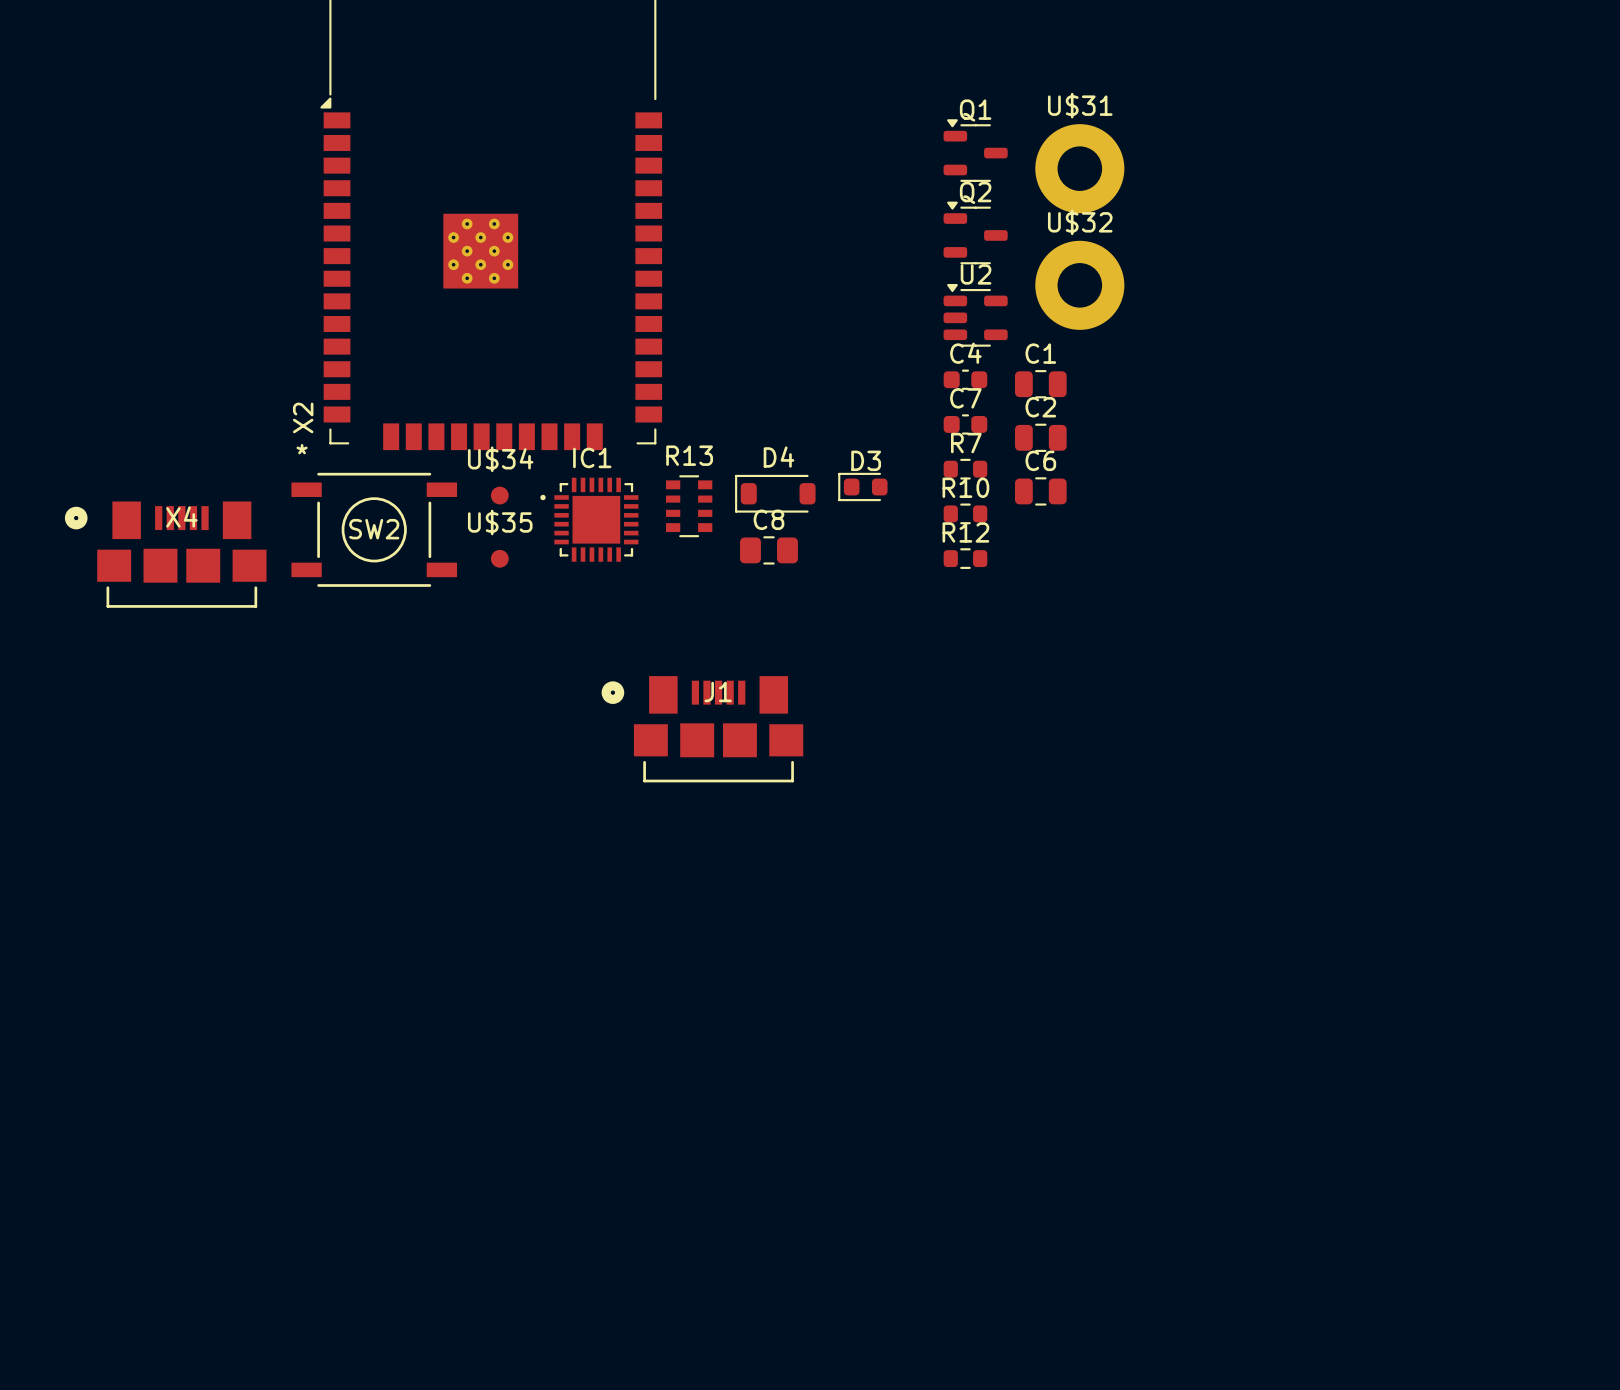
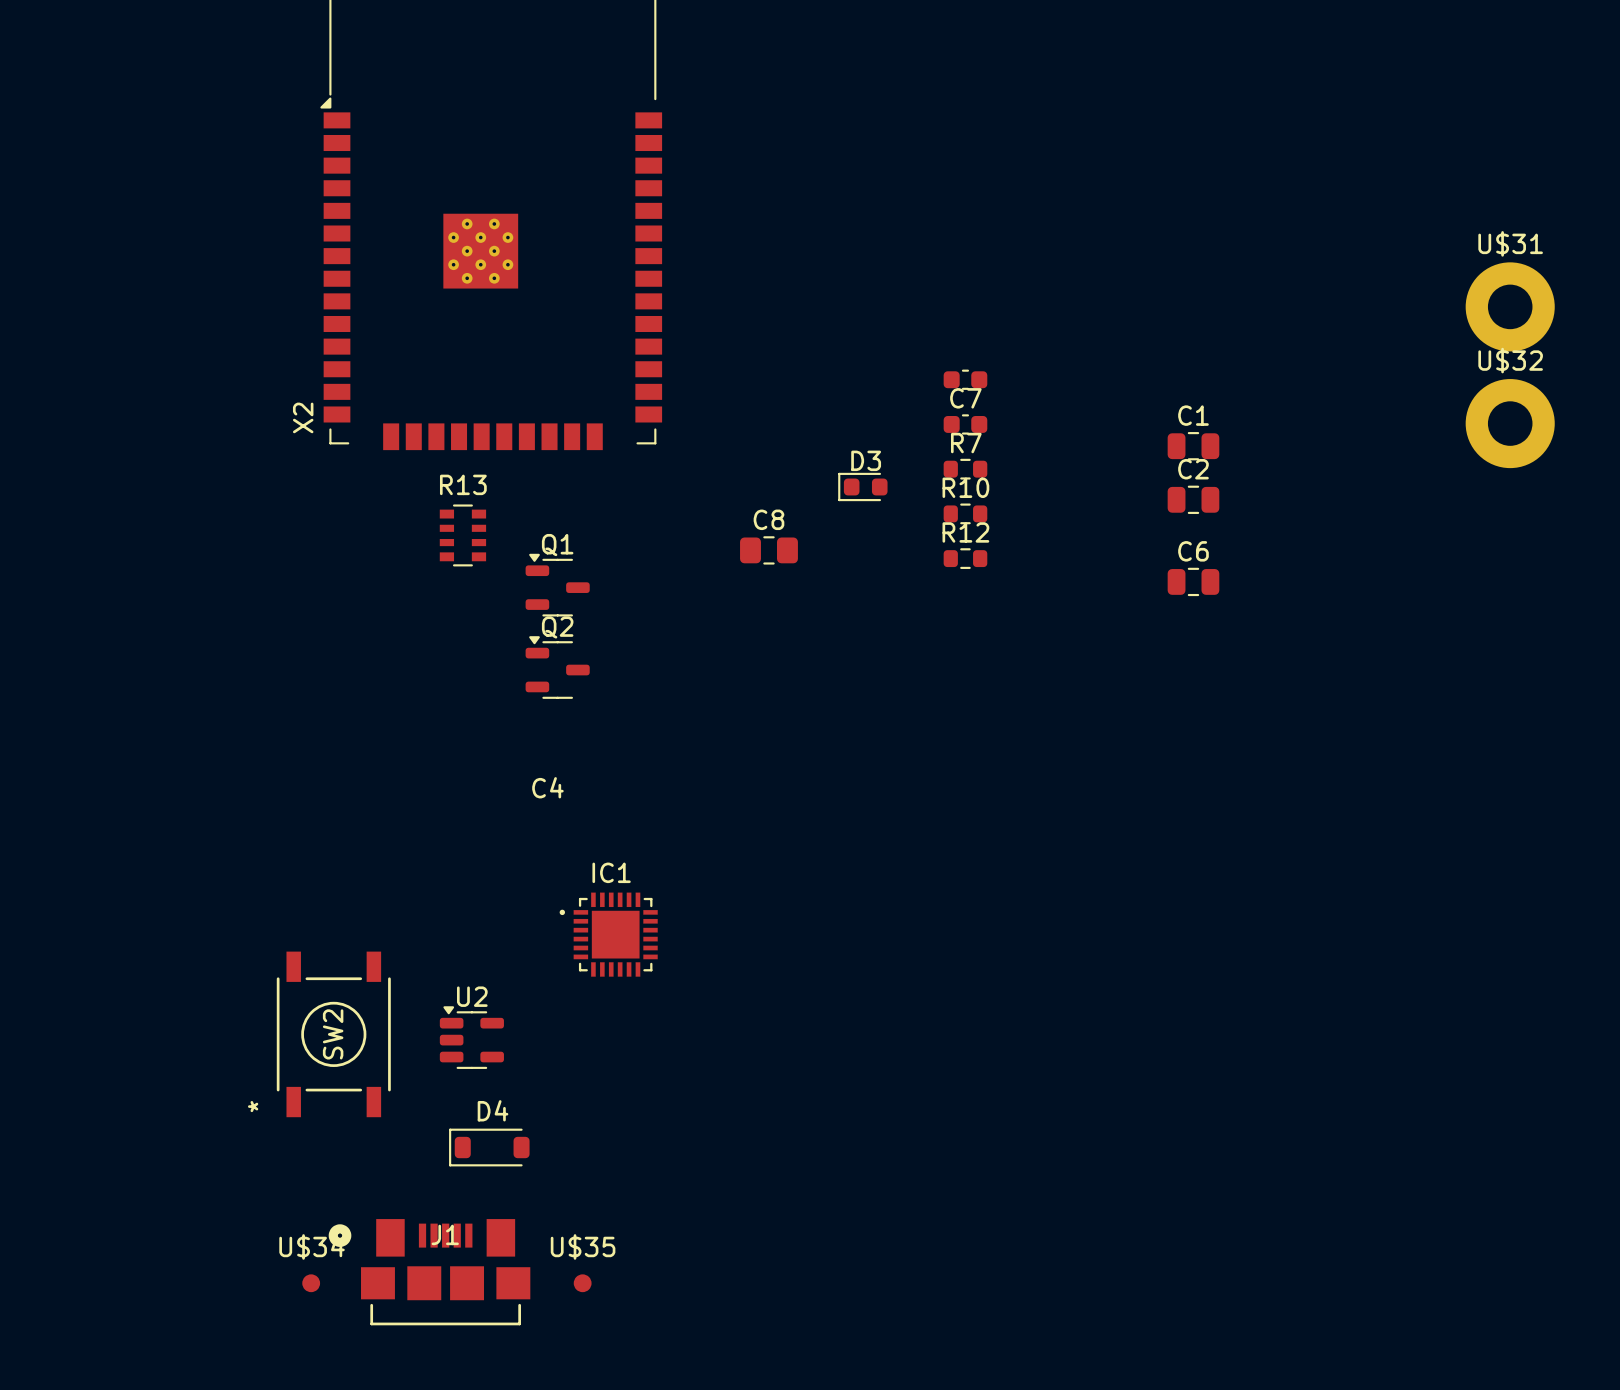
Q1 position: (975, 150) -> (557, 585)
U$31 position: (1079, 168) -> (1510, 306)
Q2 position: (975, 232) -> (557, 667)
U$32 position: (1079, 285) -> (1510, 423)
U2 position: (975, 315) -> (471, 1037)
C4 name position: C4 (965, 353) -> C4 (547, 787)
C1 position: (1040, 384) -> (1193, 446)
C2 position: (1040, 437) -> (1193, 499)
C6 position: (1040, 491) -> (1193, 581)
D4 position: (775, 493) -> (489, 1147)
U$34 position: (499, 495) -> (311, 1283)
R13 position: (689, 506) -> (462, 535)
IC1 position: (589, 519) -> (608, 934)
SW2 rotation: 0° (374, 529) -> 90° counterclockwise (333, 1034)
SW2 position: (374, 529) -> (333, 1034)
X4: (165, 554) -> none
U$35 position: (499, 558) -> (582, 1283)
J1 position: (702, 729) -> (429, 1272)

